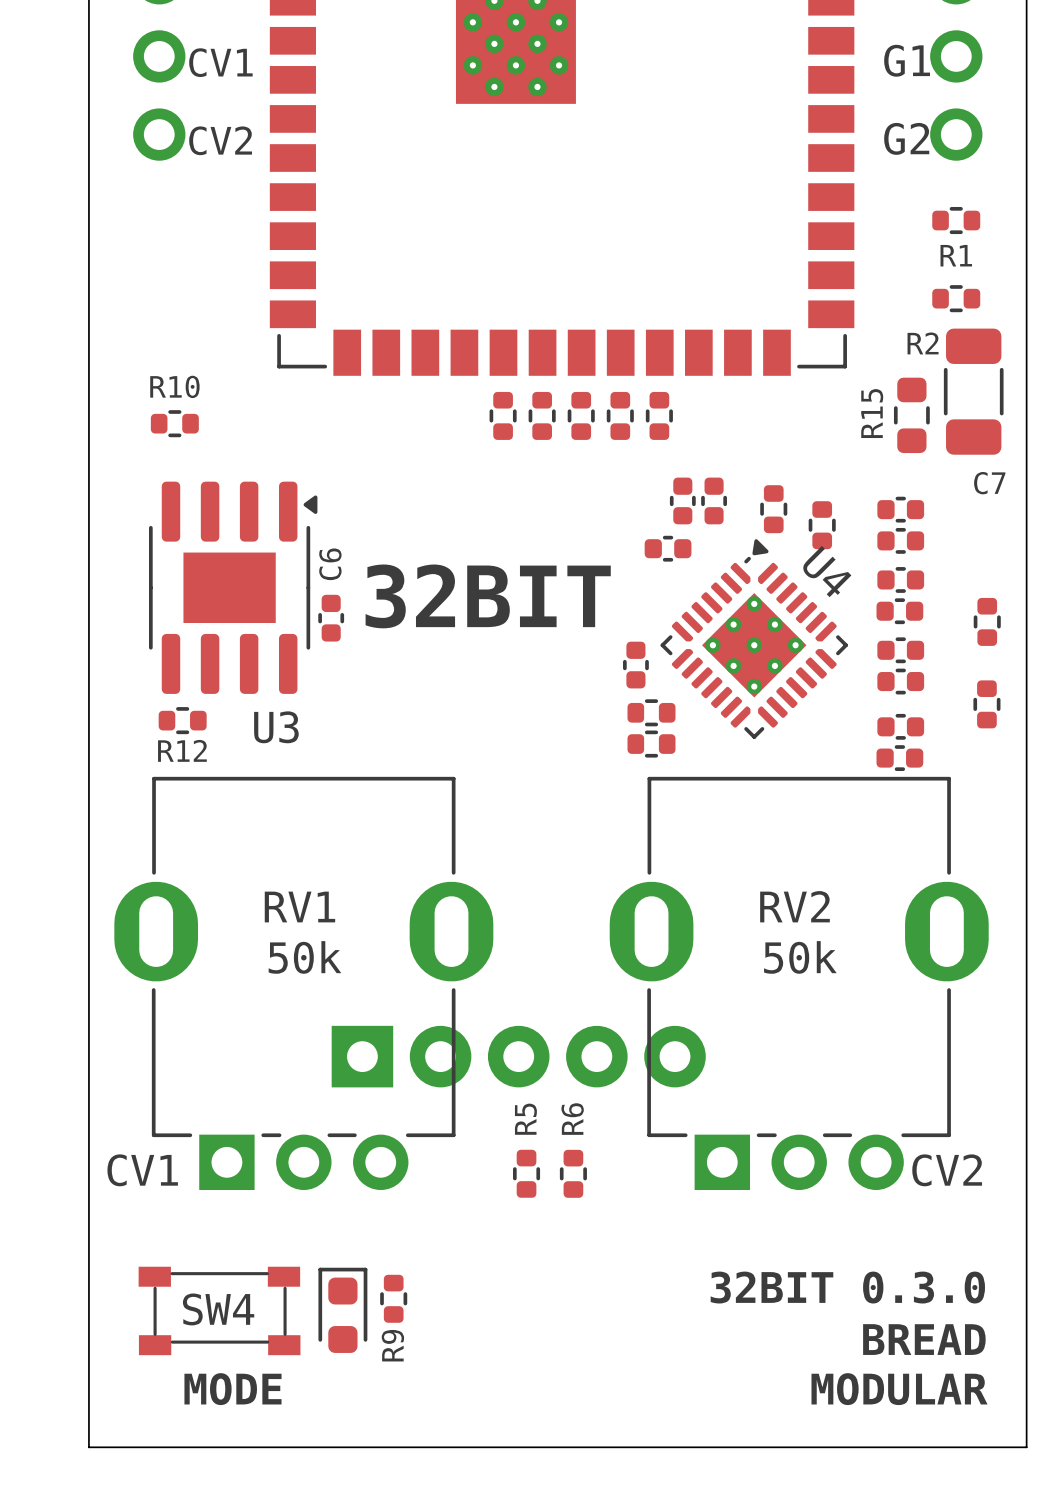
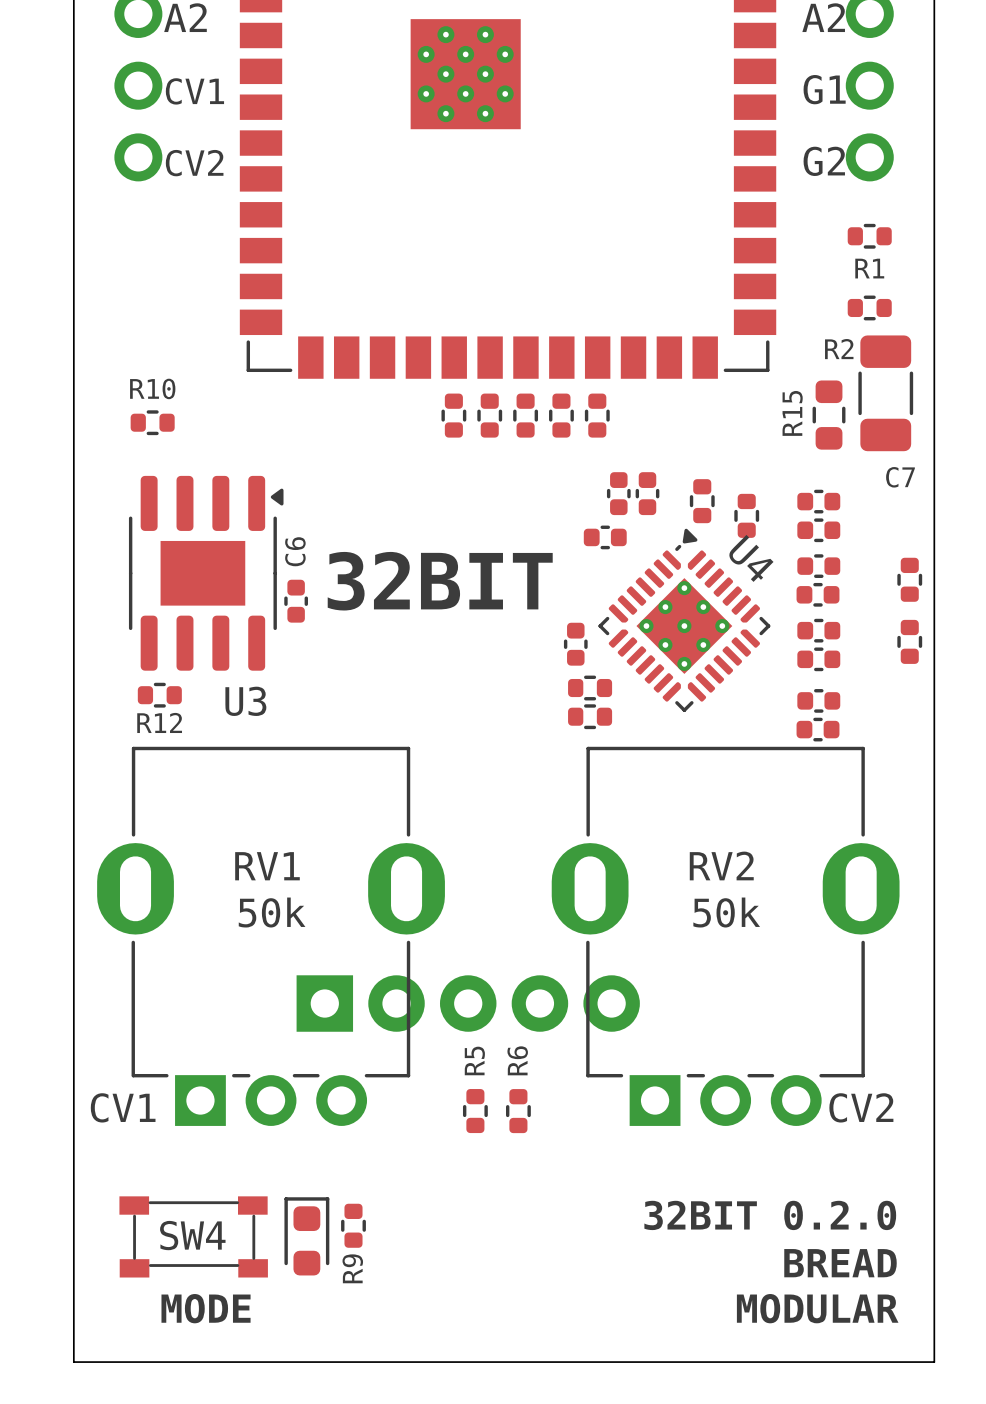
part: none -> (909, 579)
part: (987, 621) -> none
part: none -> (909, 641)
part: (986, 704) -> none
text: 32BIT 0.3.0 (847, 1287) -> 32BIT 0.2.0 (770, 1215)

